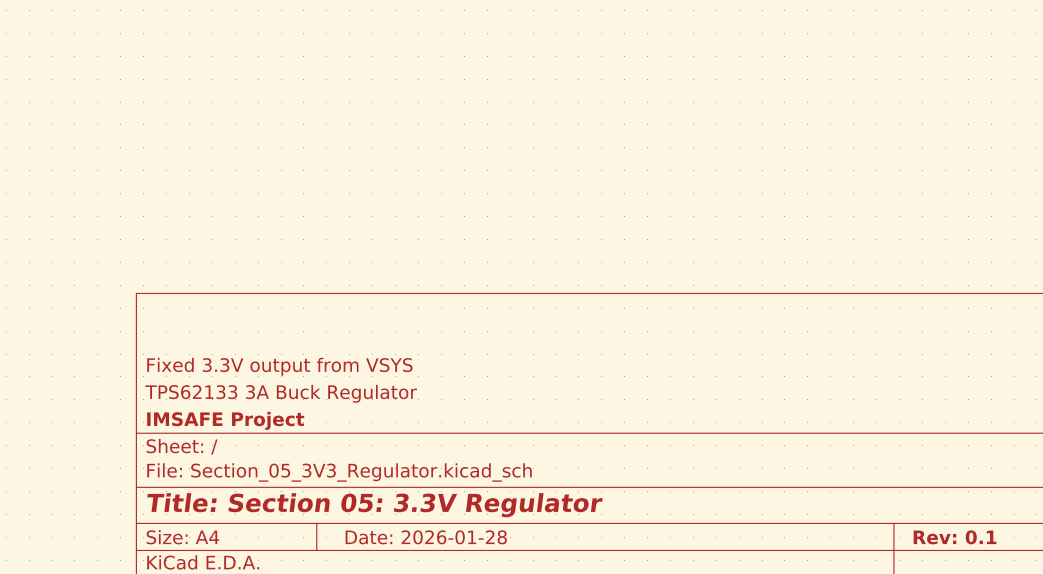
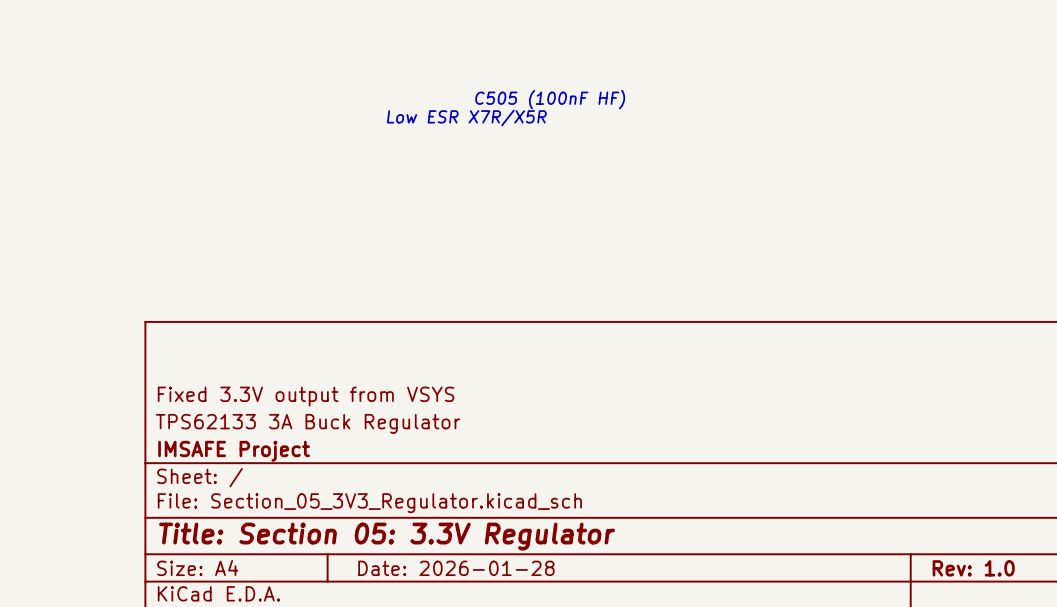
text: none -> C505 (100nF HF) (550, 99)
text: none -> Low ESR X7R/X5R (466, 117)
title block: Rev: 0.1 (955, 537) -> Rev: 1.0 (973, 568)

